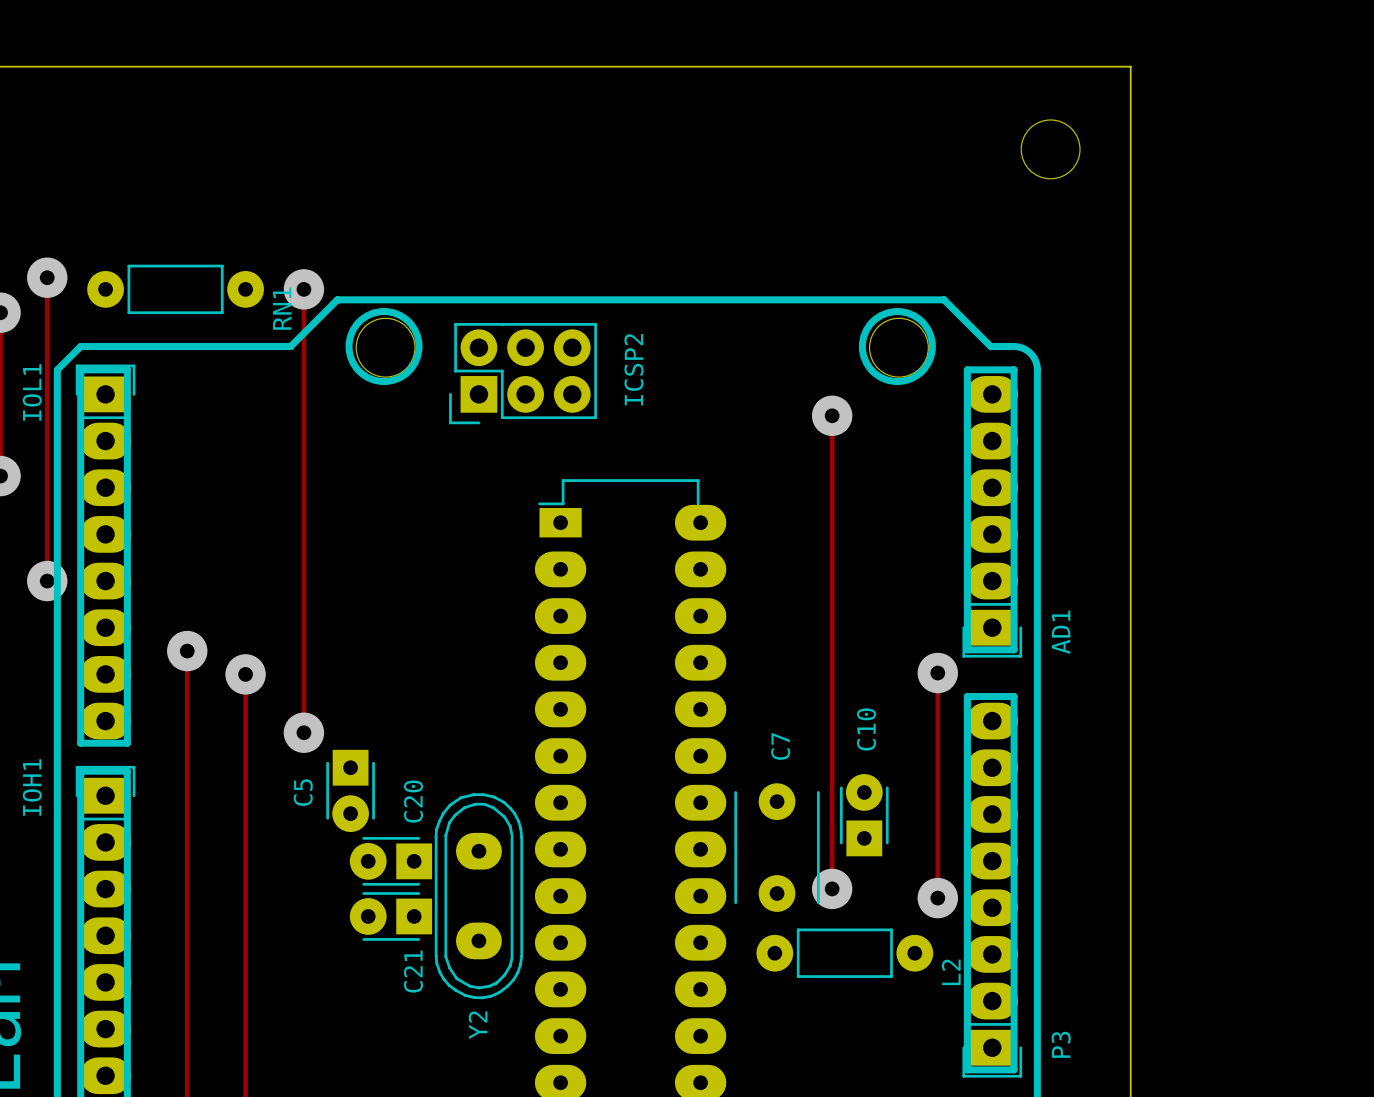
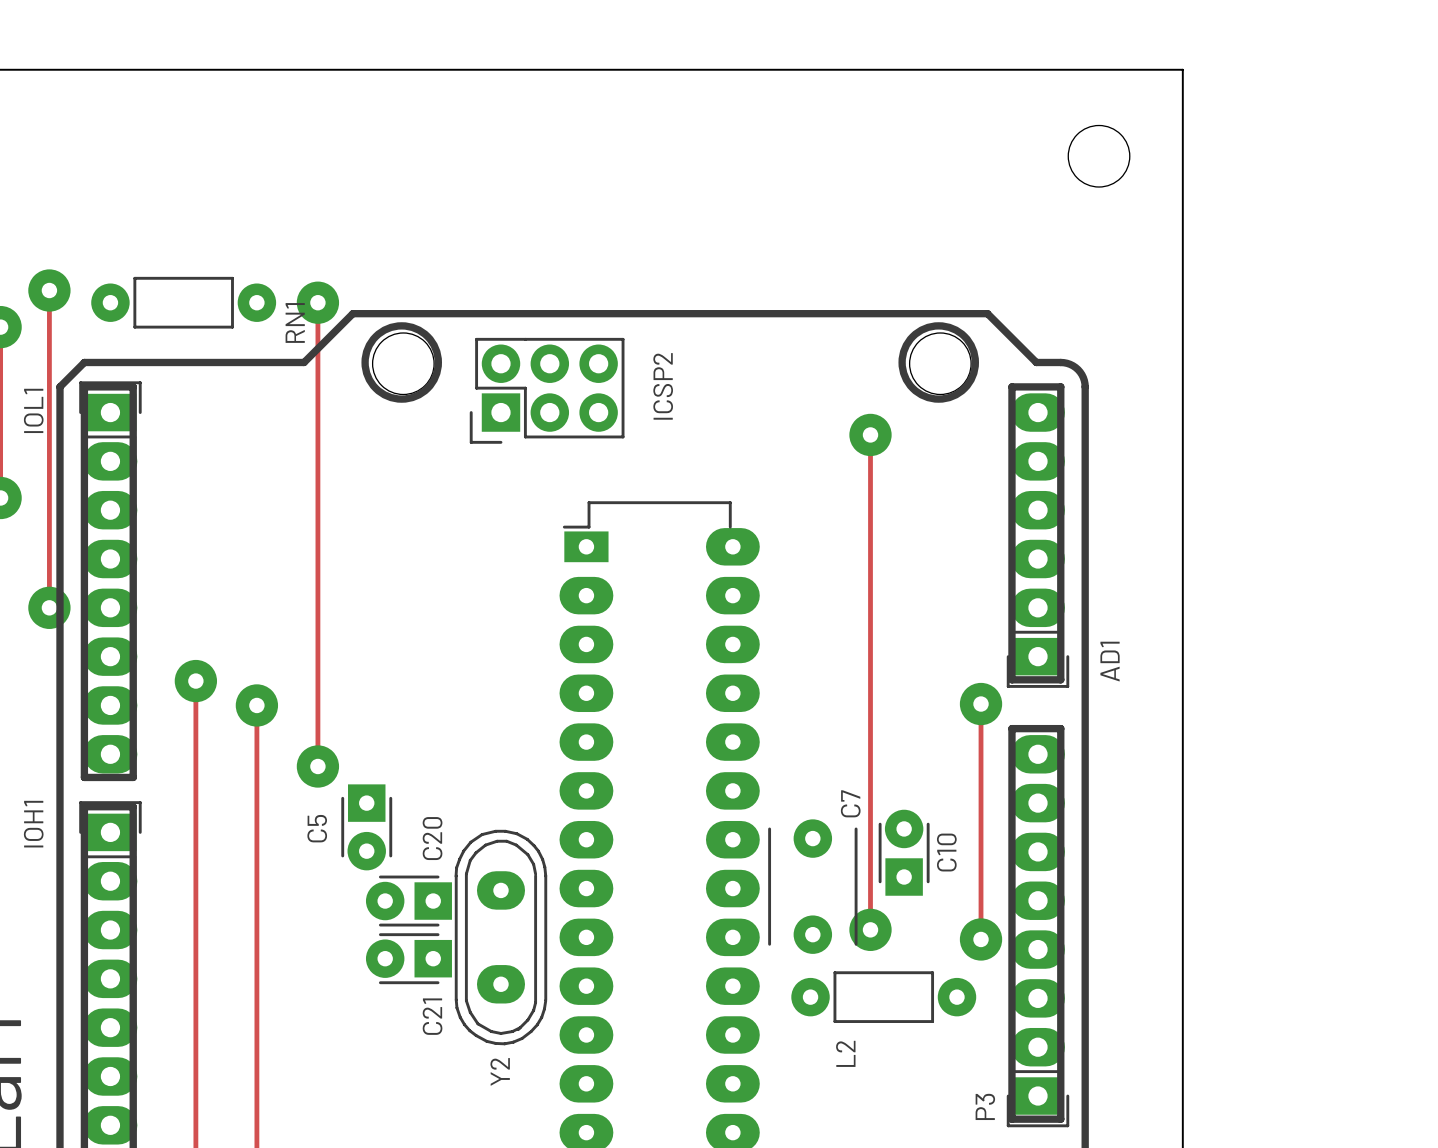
C10 name position: C10 (866, 729) -> C10 (946, 852)
C7 name position: C7 (780, 746) -> C7 (850, 803)
L2 name position: L2 (951, 972) -> L2 (845, 1053)
P3 name position: P3 (1061, 1044) -> P3 (985, 1106)

